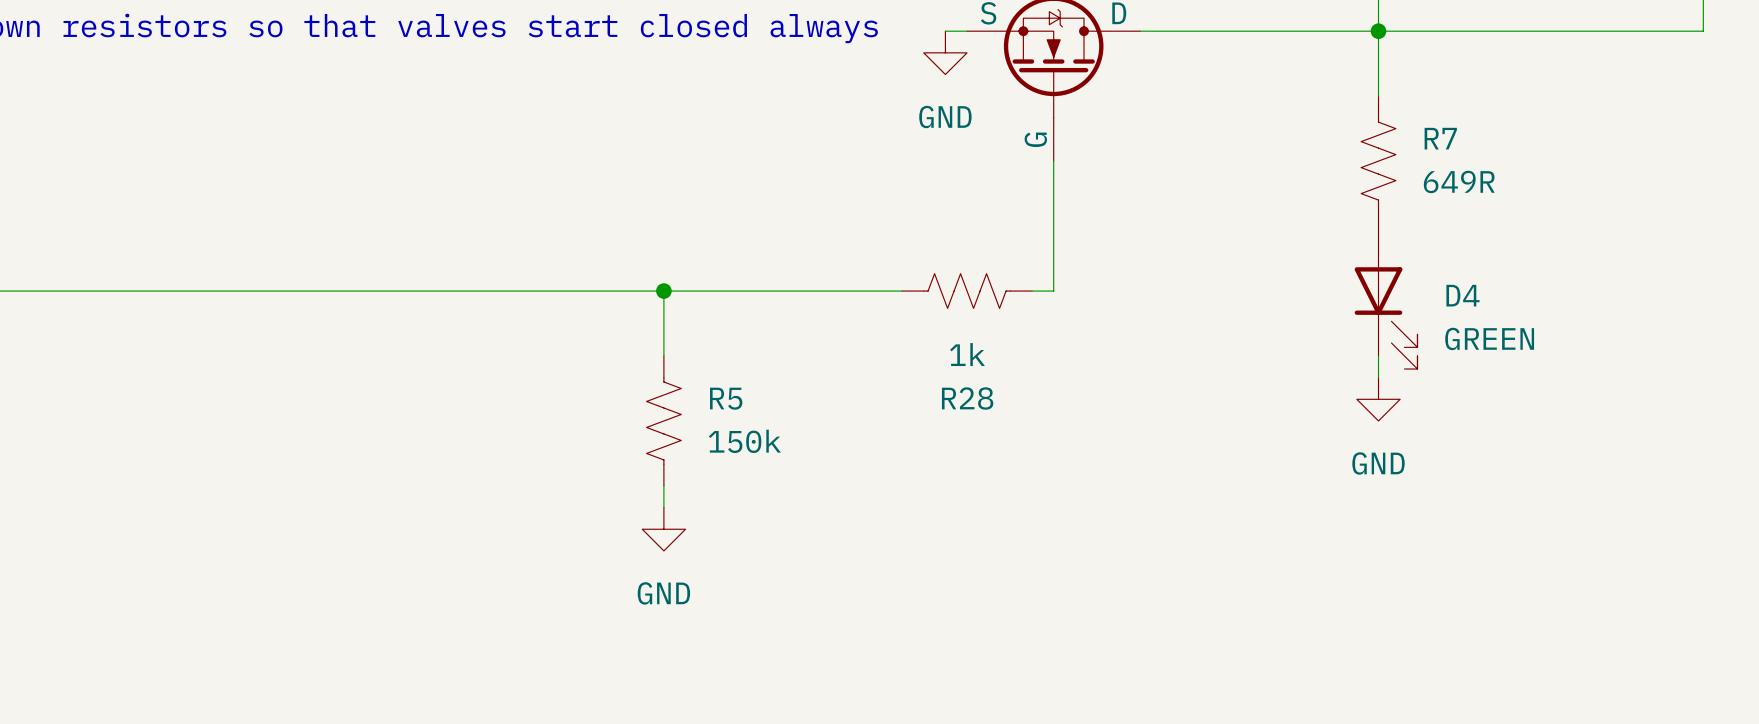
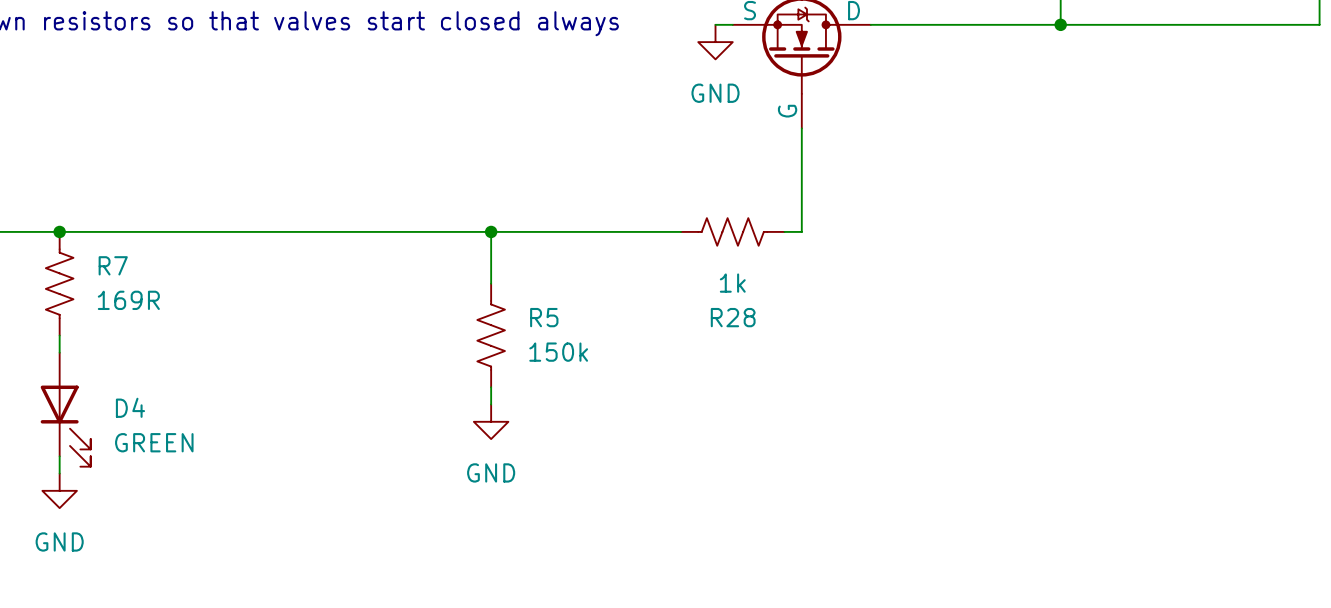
wire: (1378, 31) (1378, 96) -> none
R7 position: (1378, 161) -> (59, 283)
R7 value: 649R (1459, 181) -> 169R (128, 300)
junction: none -> (59, 231)
D4 position: (1386, 297) -> (65, 409)
wire: (1378, 356) (1378, 377) -> none
power symbol: GND (1378, 399) -> none
wire: none -> (59, 335) (59, 352)
wire: none -> (59, 456) (59, 473)
power symbol: none -> GND (59, 490)

